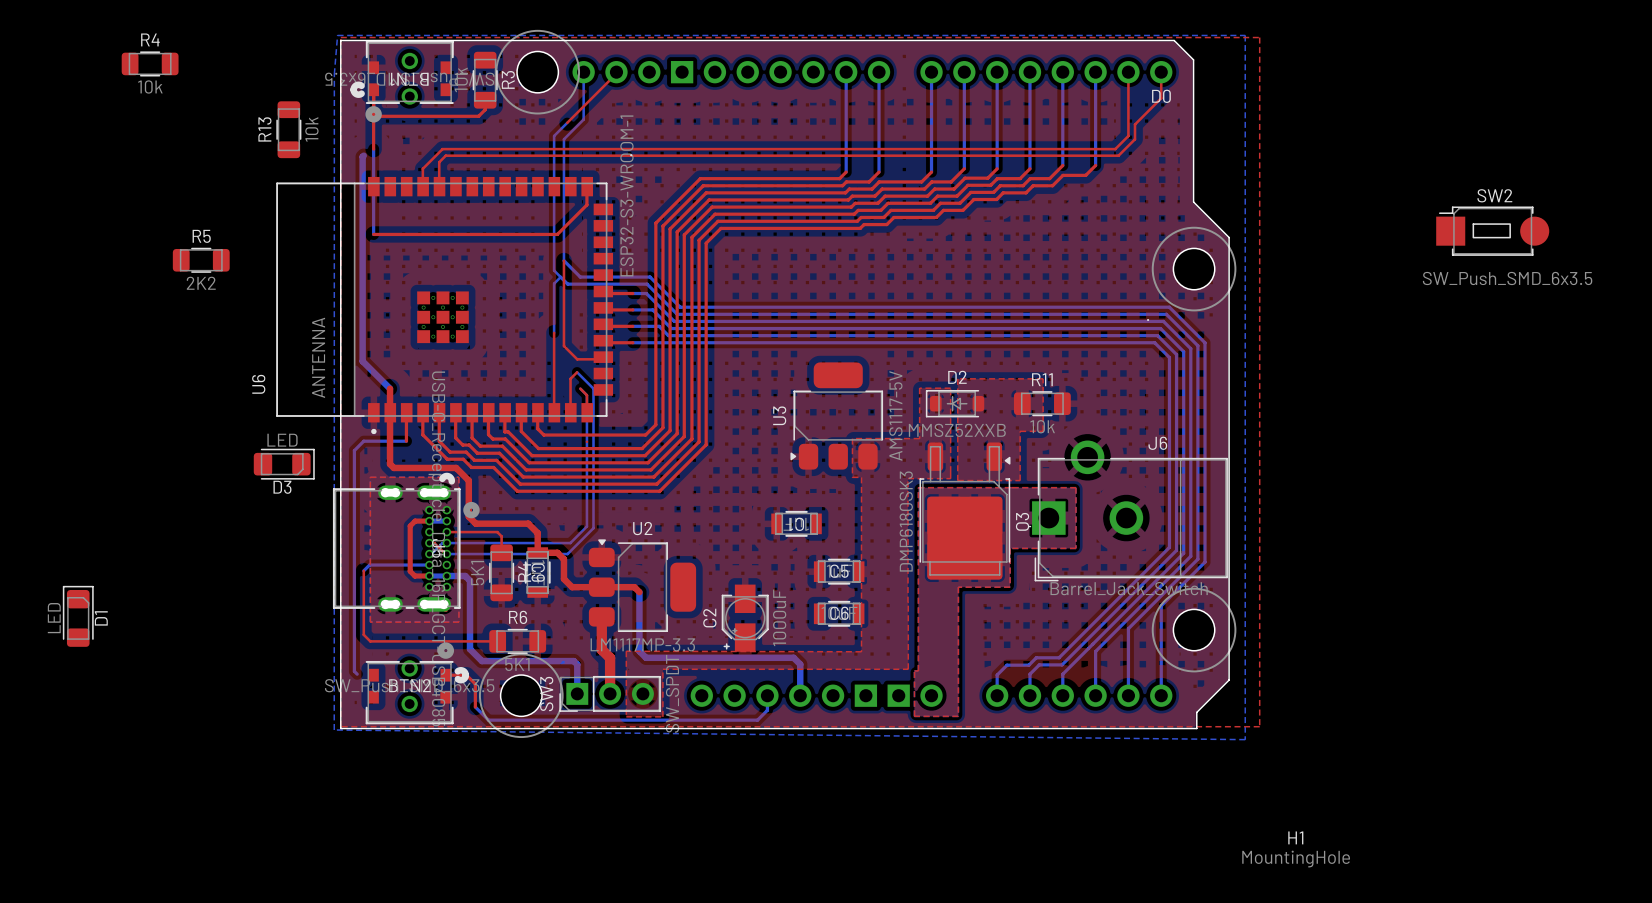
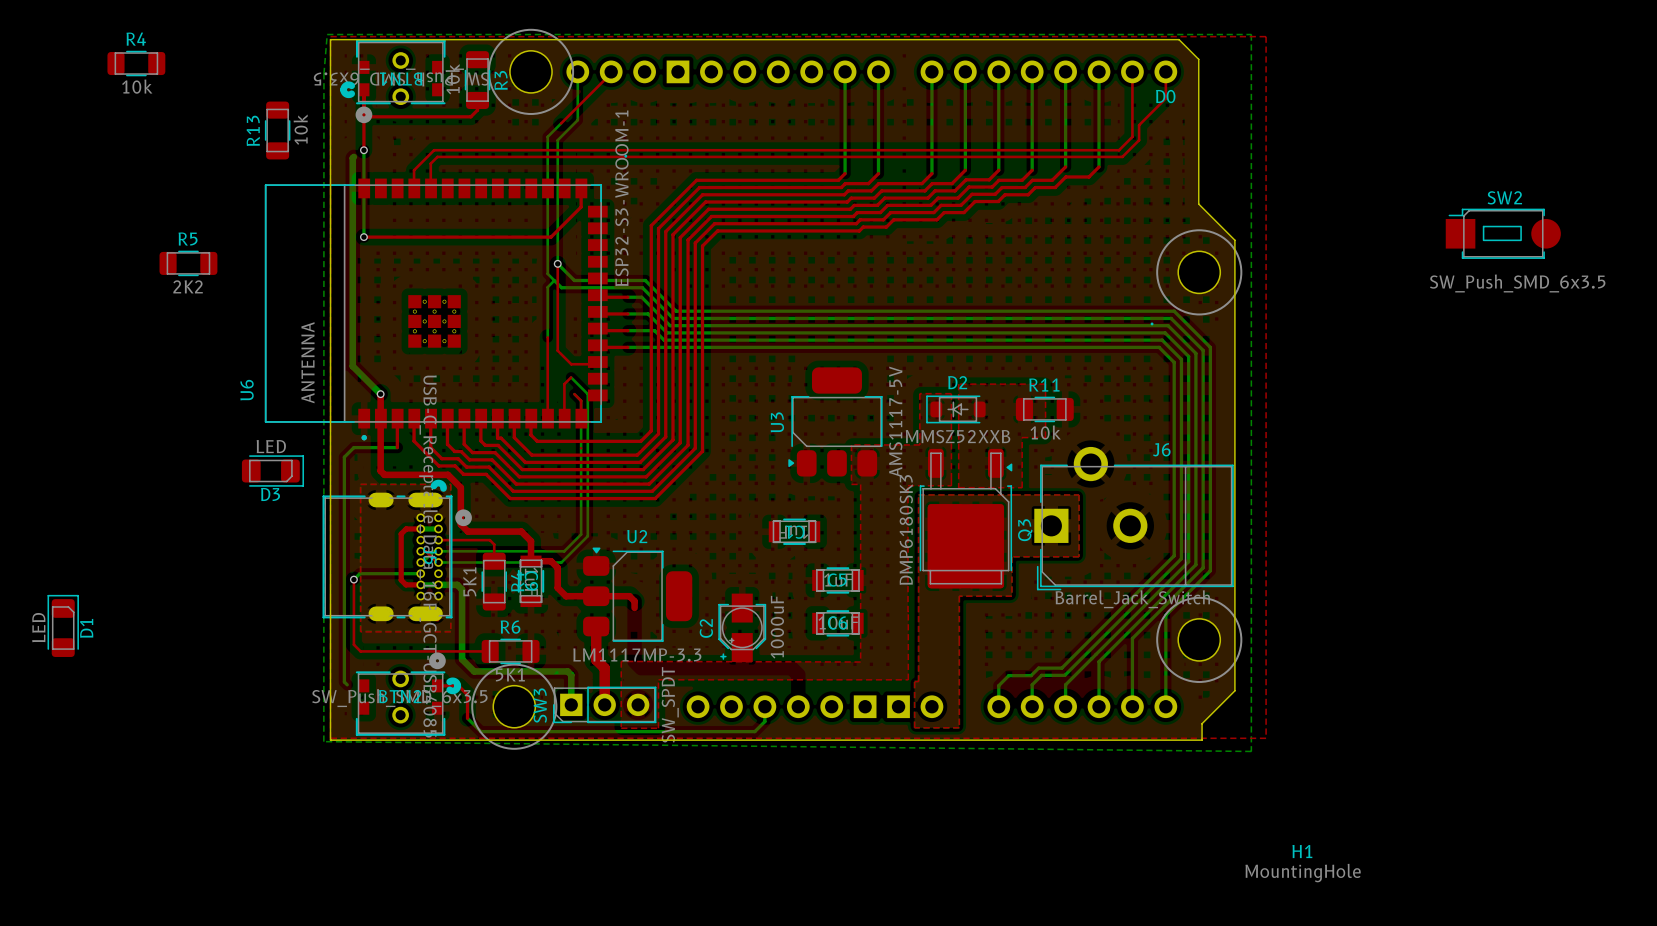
via: none -> (363, 150)
via: none -> (363, 237)
via: none -> (557, 263)
via: none -> (380, 394)
via: none -> (353, 579)
top track: none -> (634, 601) (634, 607)
bottom track: (639, 592) (639, 651) (646, 657) (793, 657) (800, 664) (800, 693) -> none

